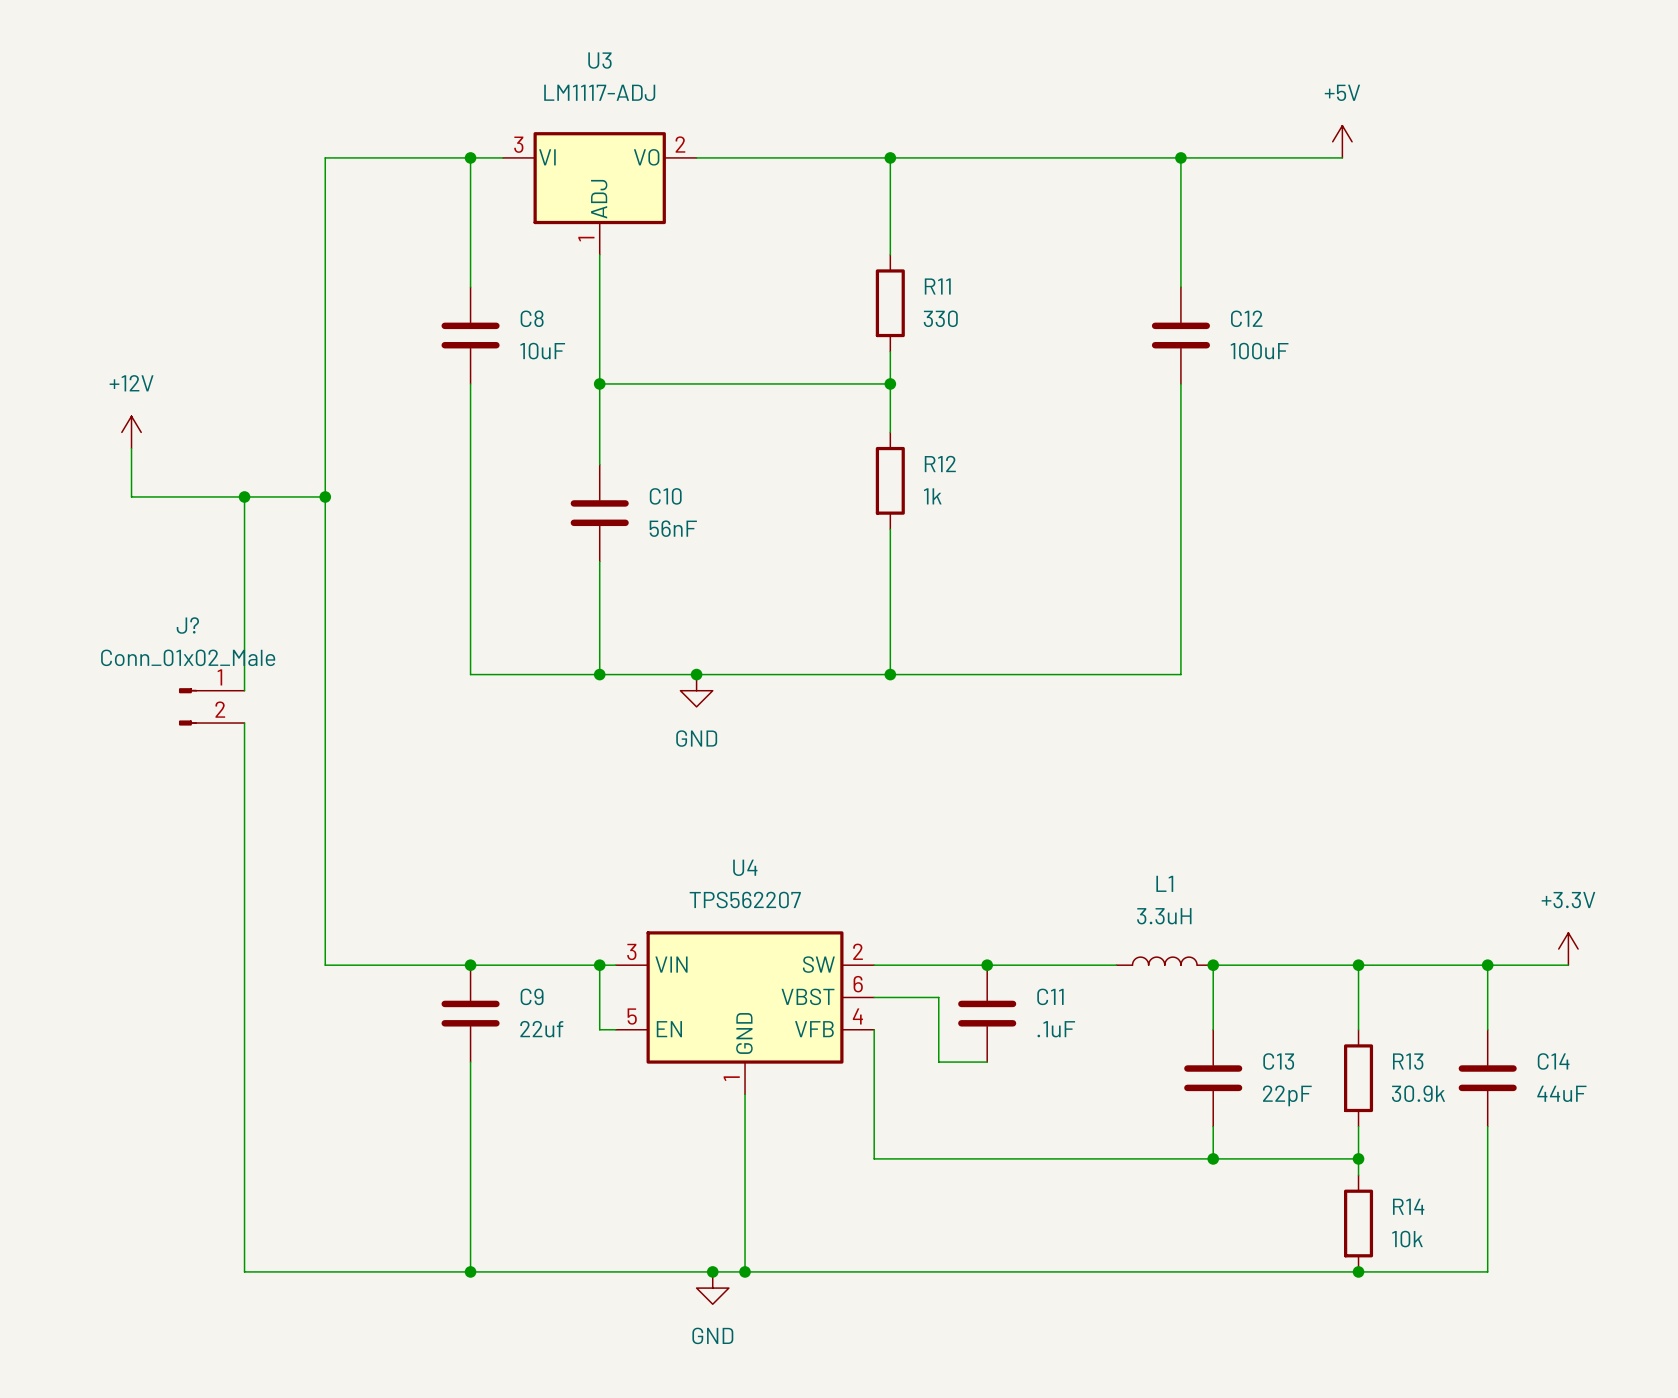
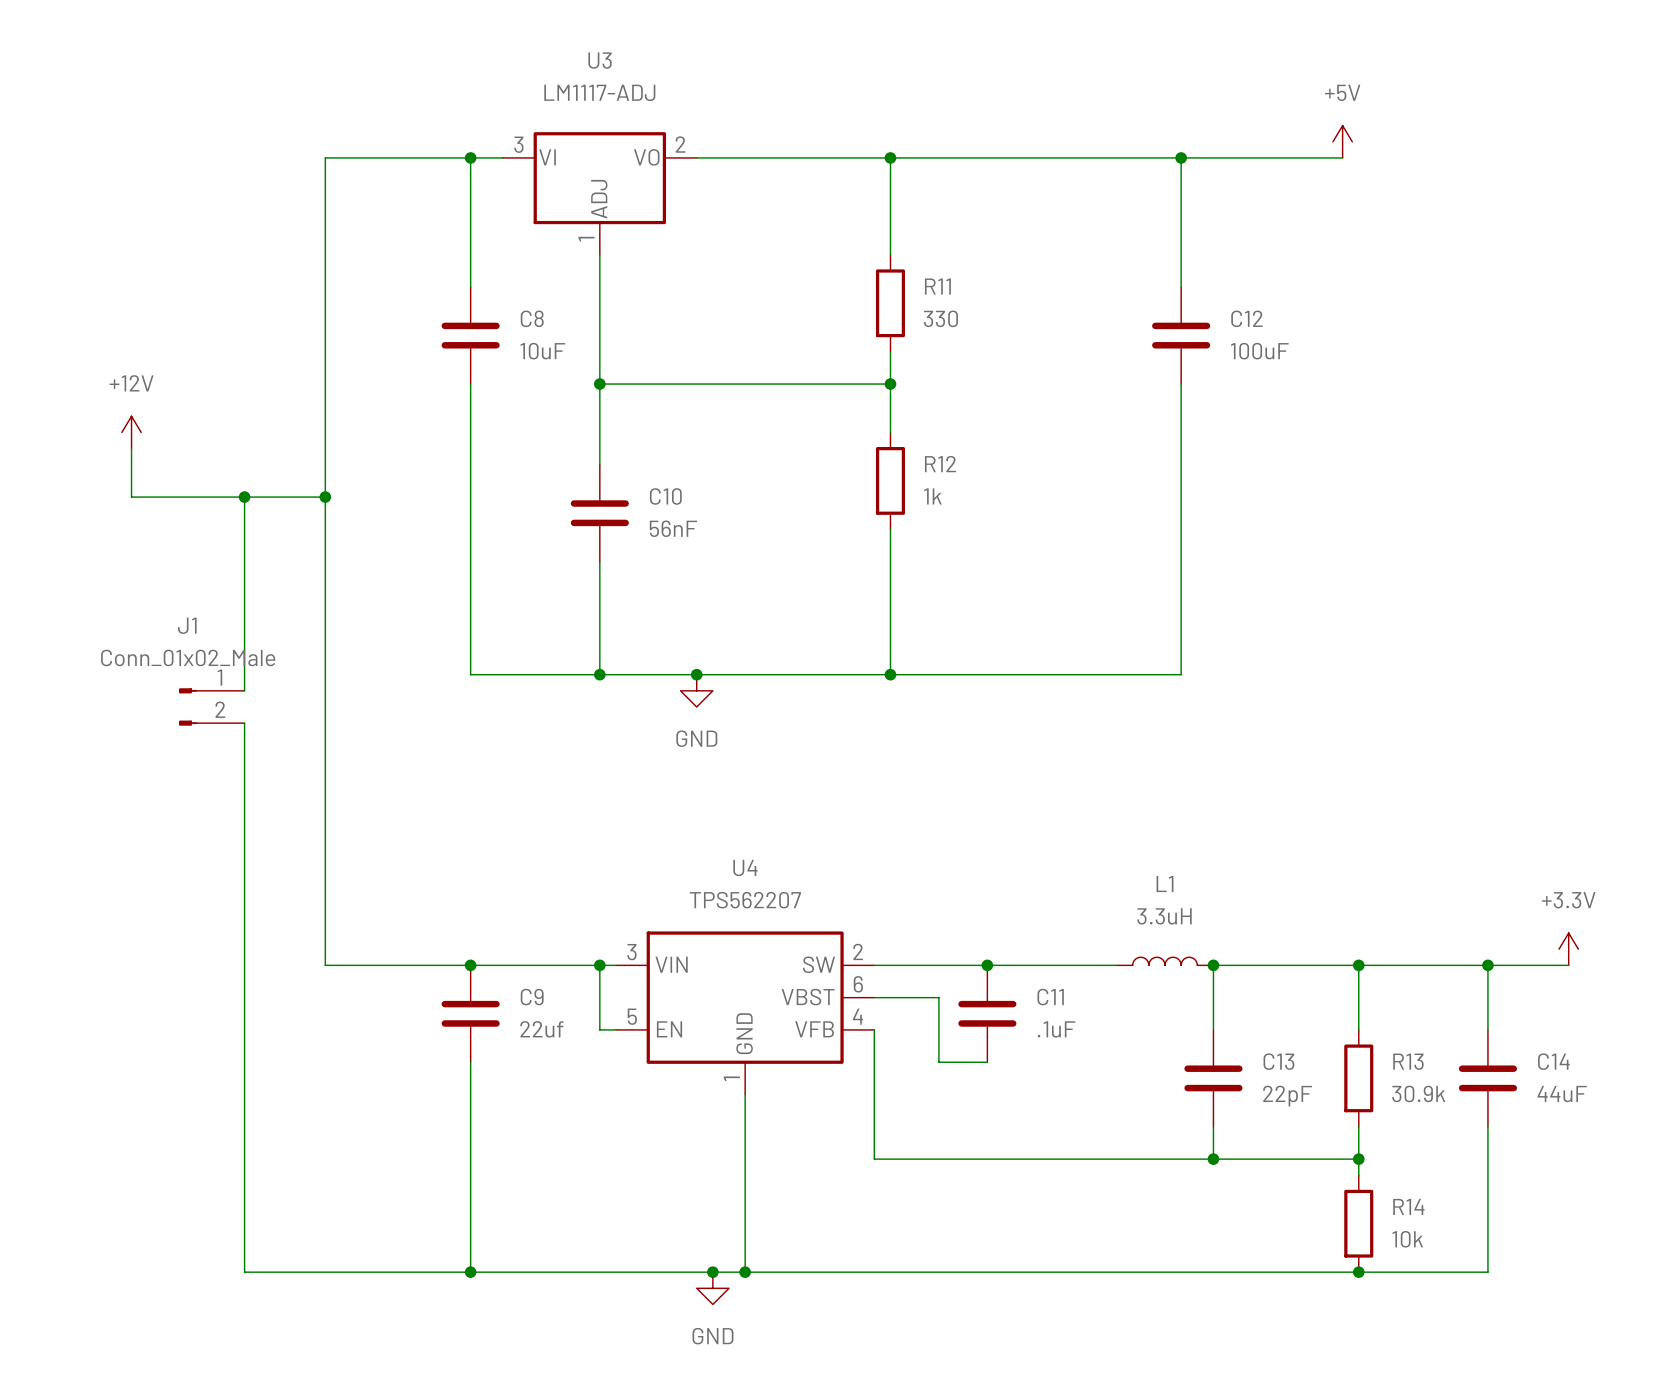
J? name: J? (187, 625) -> J1 (187, 625)

